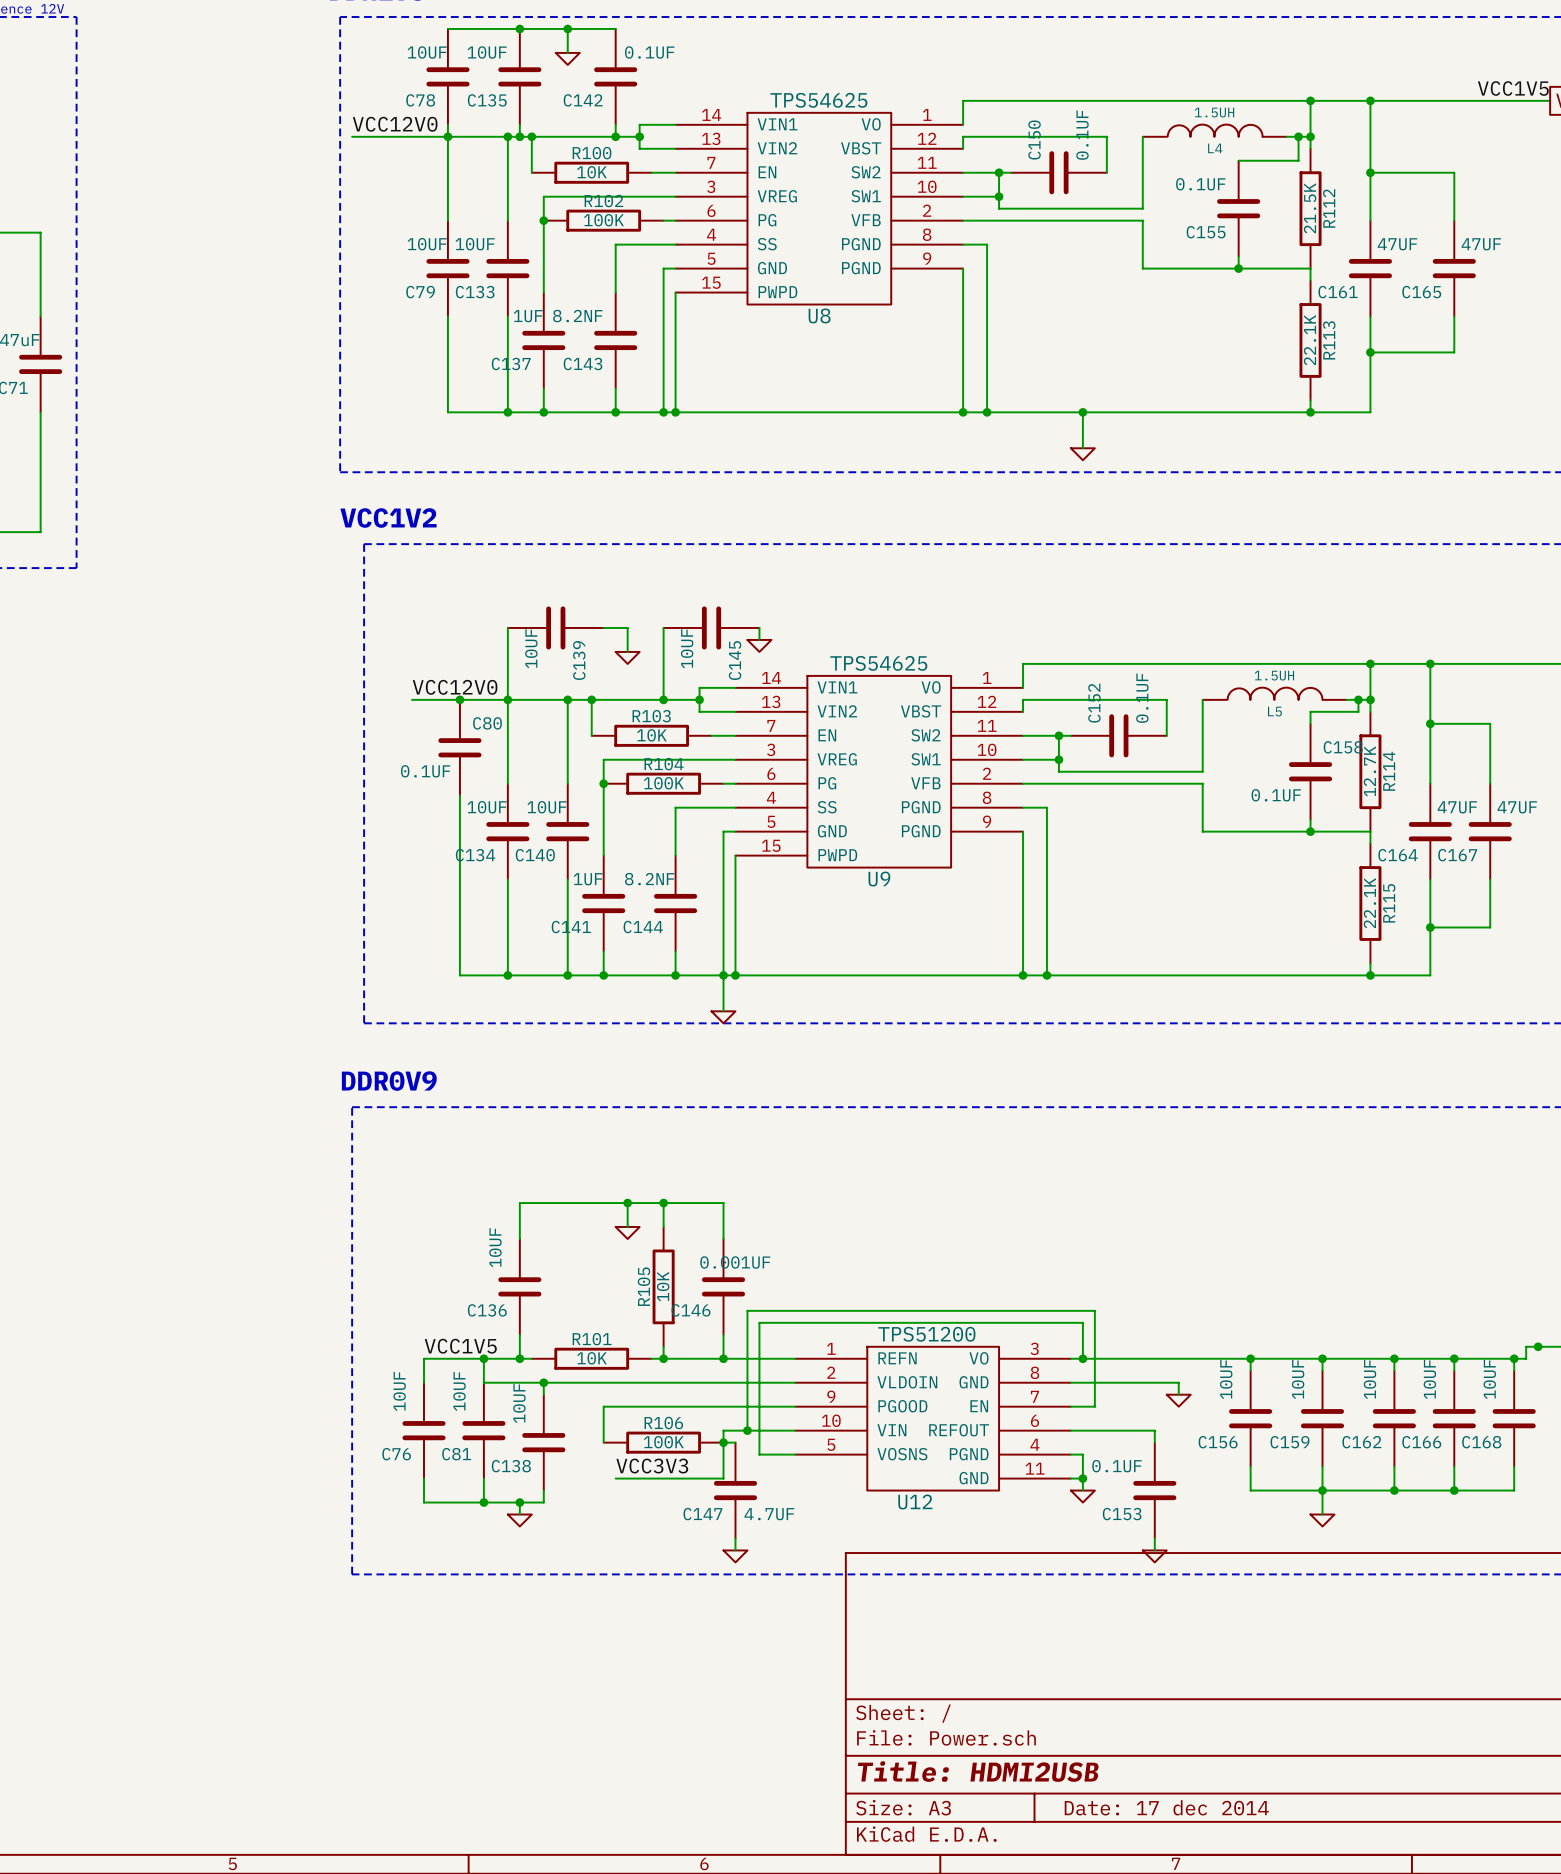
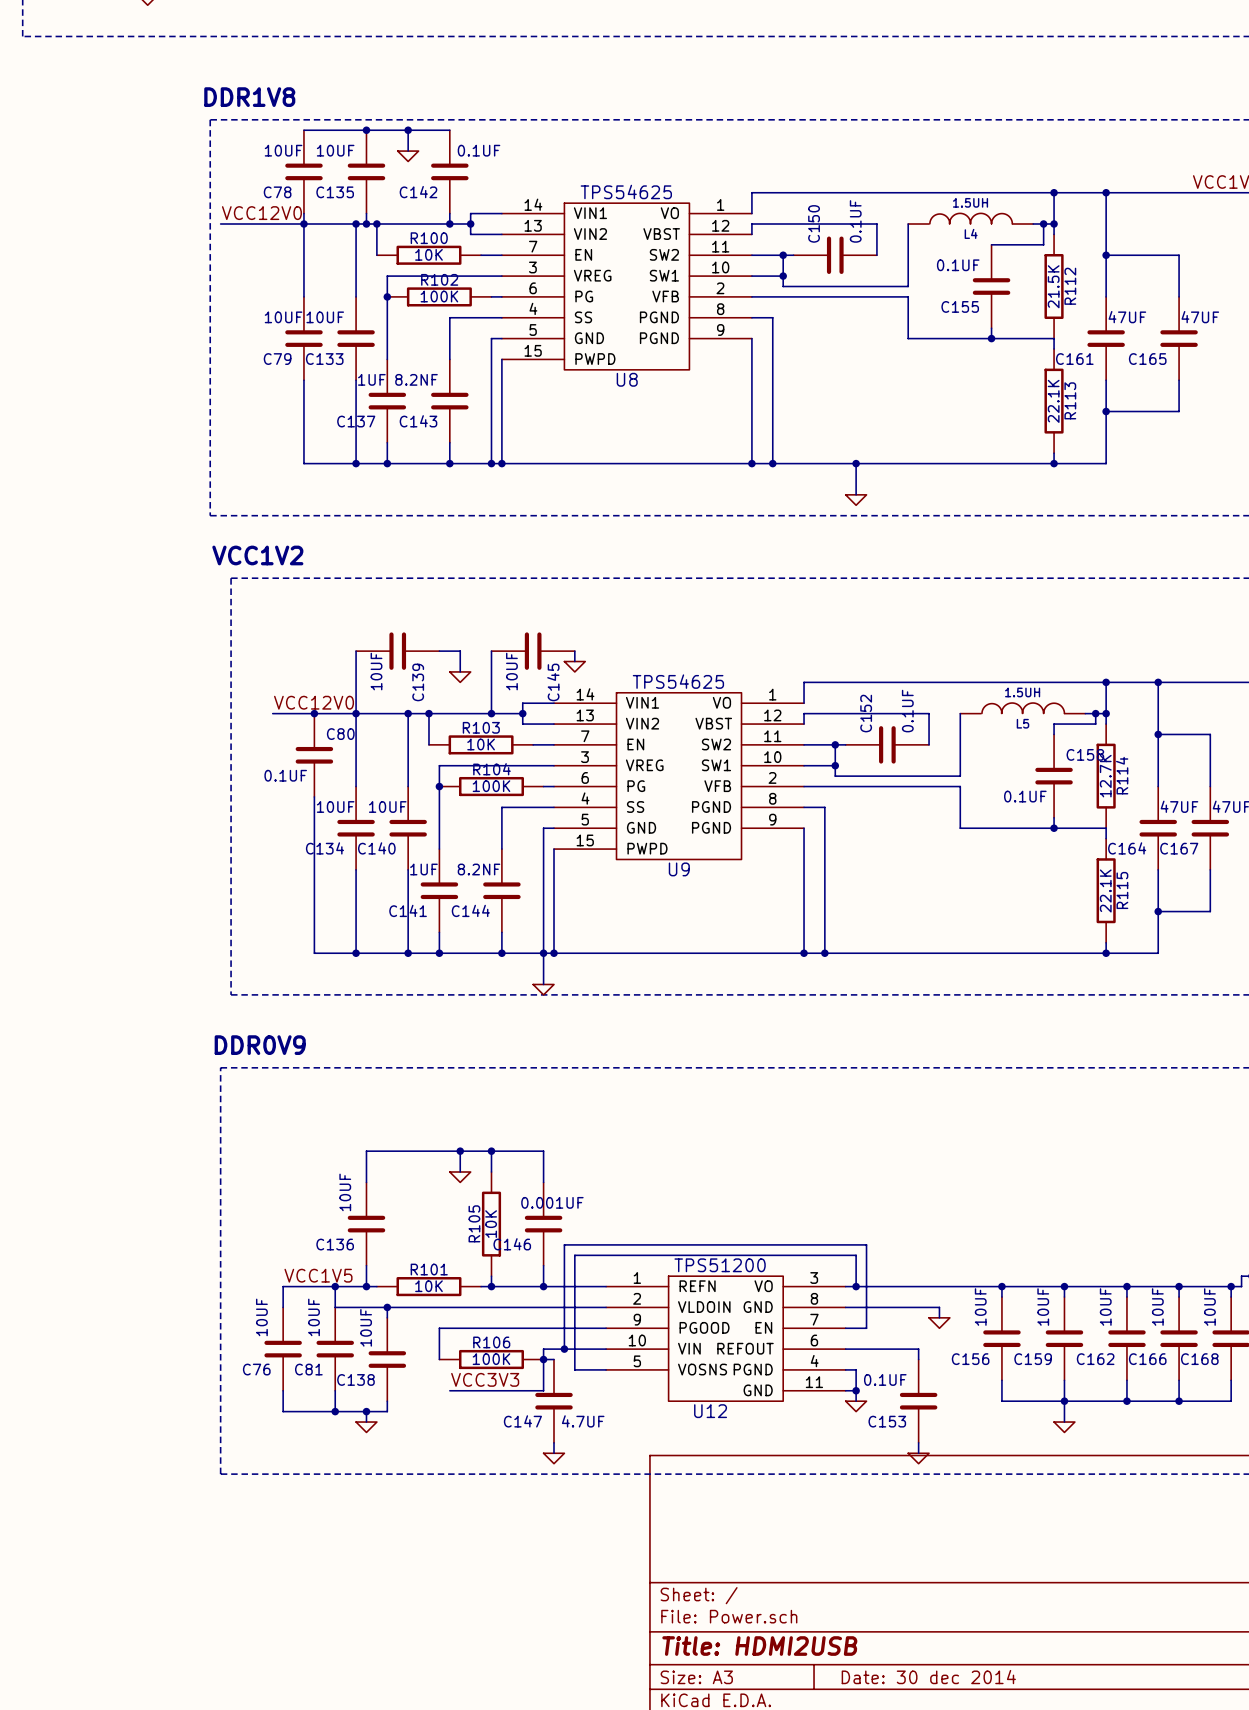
title block: Date: 17 dec 2014 (1166, 1807) -> Date: 30 dec 2014 (928, 1677)

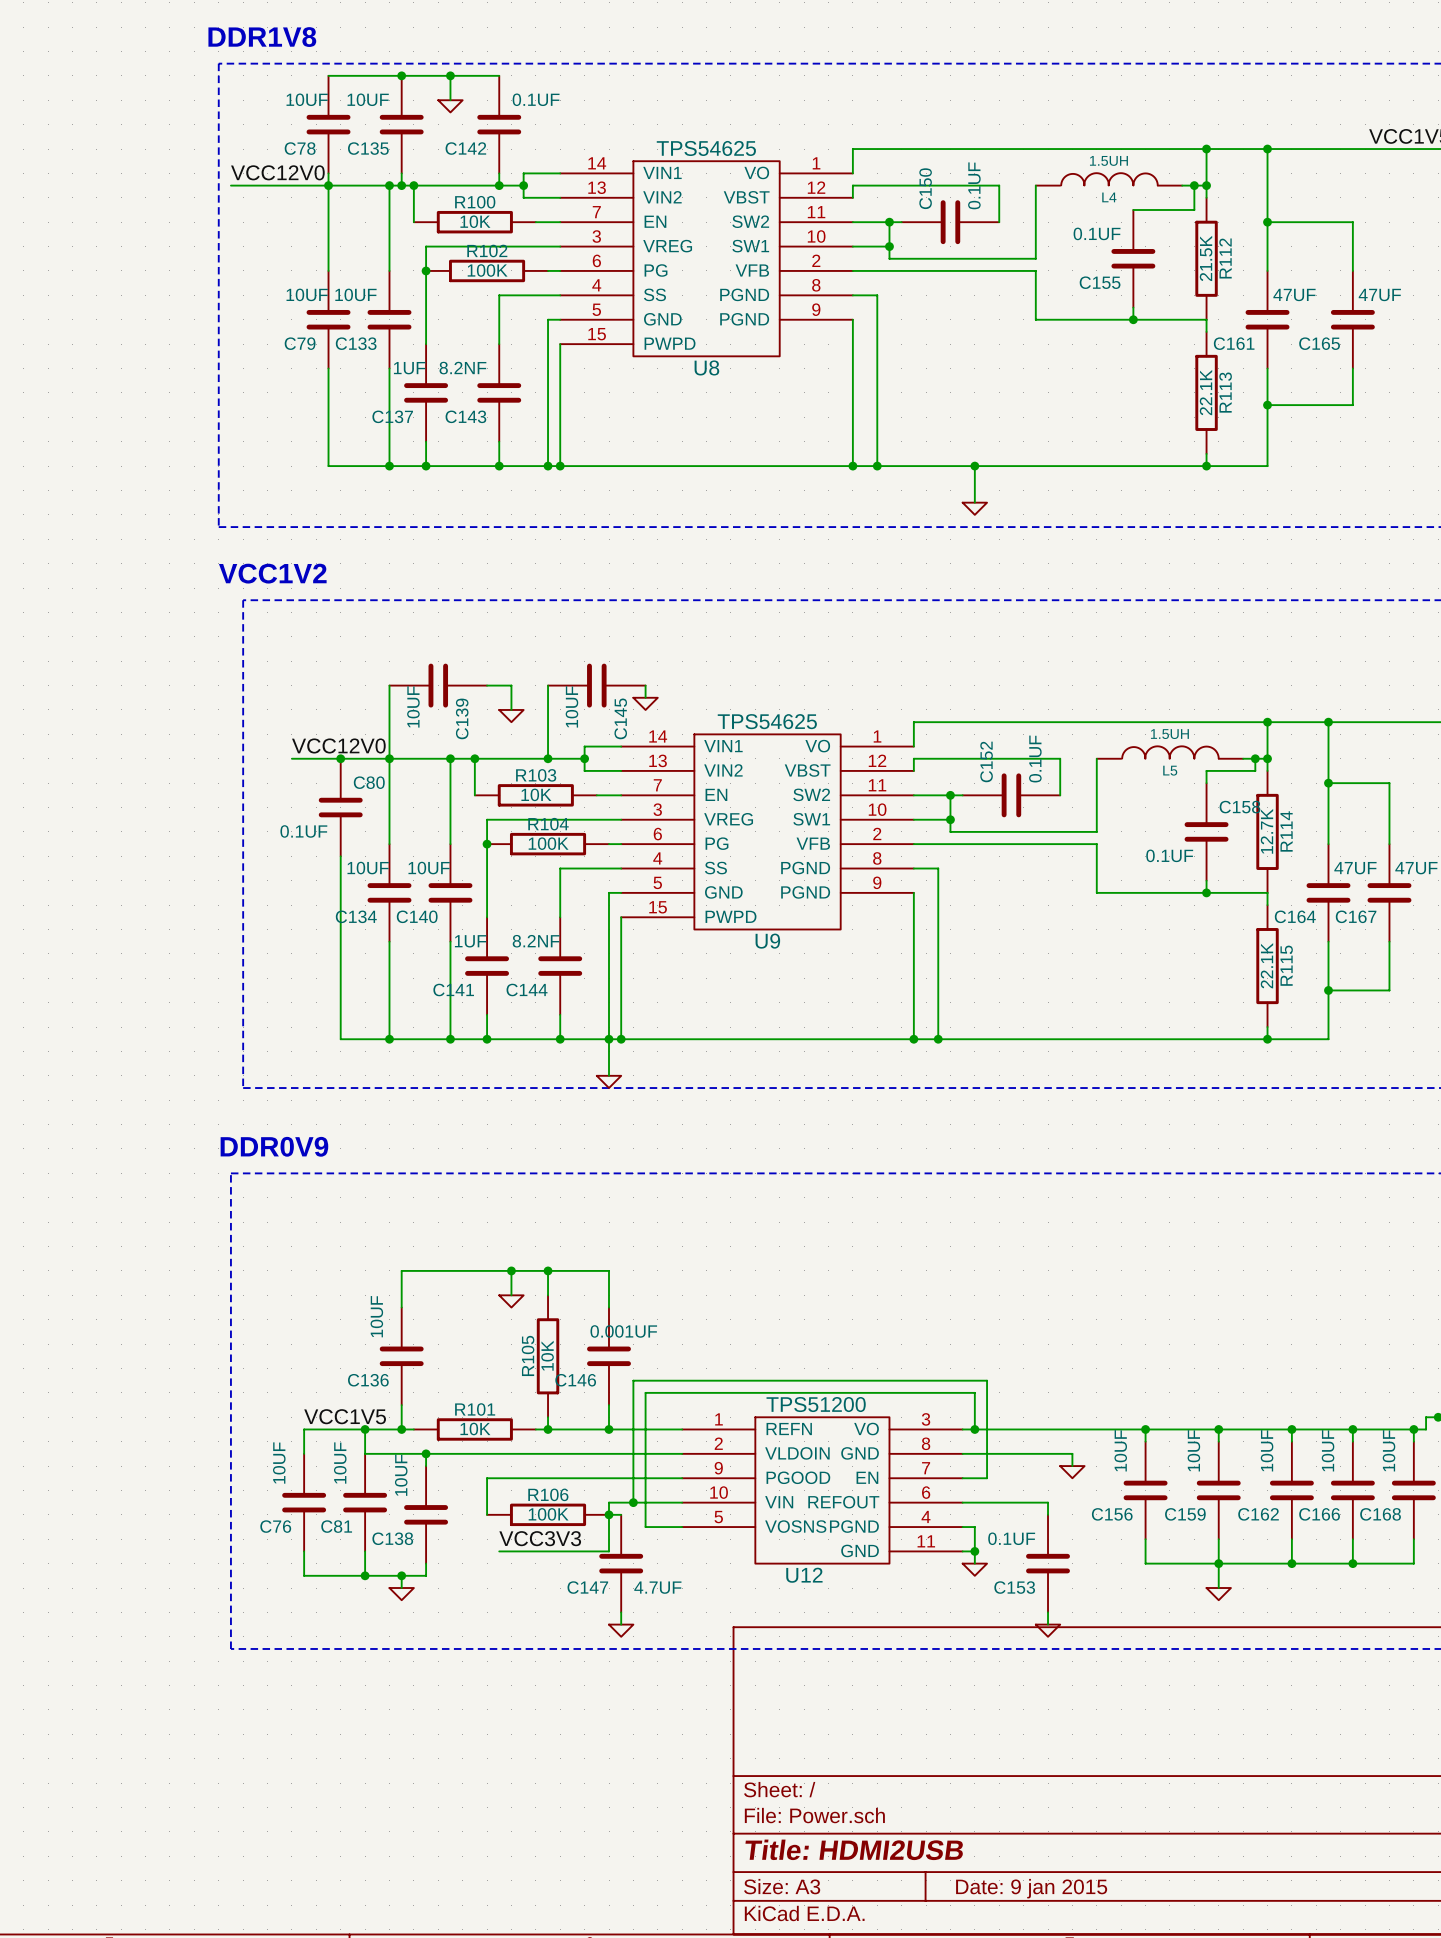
title block: Date: 30 dec 2014 (928, 1677) -> Date: 9 jan 2015 (1031, 1888)

